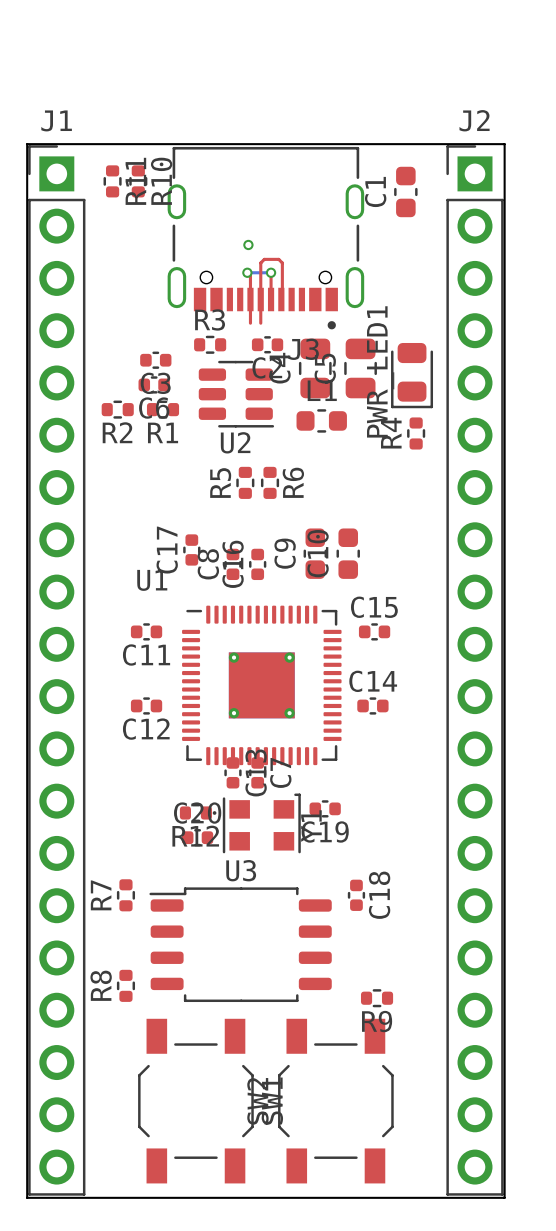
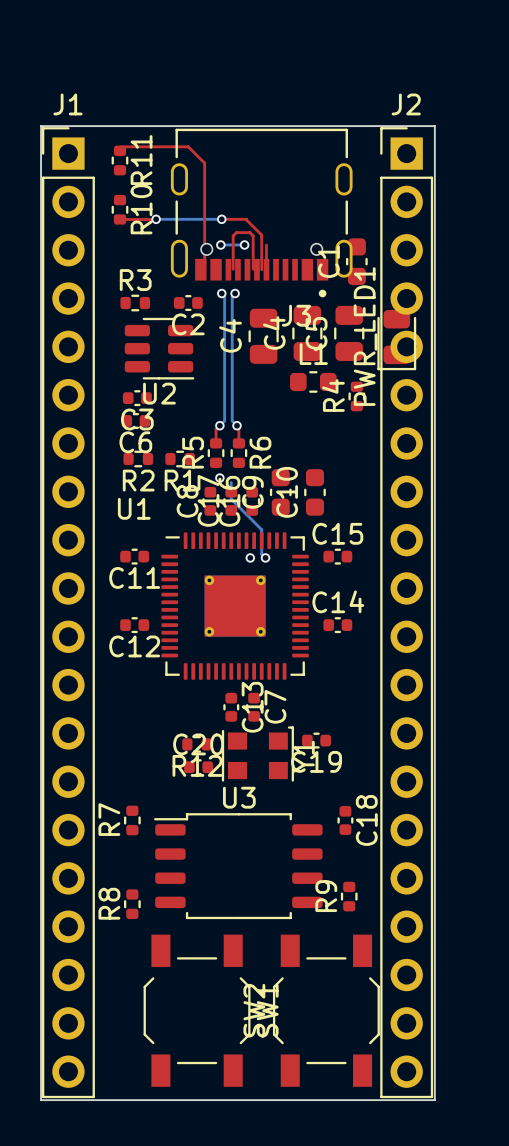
board edge: (453, 144) (504, 144) (504, 1197) (453, 1197) -> (434, 126) (434, 1100)
top track: none -> (120, 146) (188, 146) (204, 163) (204, 269)
R10 position: (138, 181) -> (120, 209)
C1 position: (405, 191) -> (356, 261)
bottom track: none -> (156, 219) (221, 219)
via: none -> (156, 219)
top track: none -> (221, 219) (246, 219) (261, 235) (261, 269)
via: none -> (221, 219)
via: (248, 244) -> none
top track: none -> (120, 219) (155, 219)
via: none -> (220, 244)
top track: (247, 272) (250, 275) (250, 323) -> none
bottom track: (247, 272) (271, 272) -> (220, 244) (242, 244)
via: (271, 272) -> none
top track: (260, 299) (260, 262) (264, 259) (278, 259) (282, 262) (282, 299) -> (233, 269) (233, 235) (236, 232) (249, 232) (253, 235) (253, 269)
top track: (260, 299) (260, 323) -> none
bottom track: none -> (221, 293) (224, 296) (224, 420) (219, 425)
via: none -> (221, 293)
bottom track: none -> (235, 293) (232, 296) (232, 420) (237, 425)
via: none -> (235, 293)
R3 position: (210, 344) -> (135, 303)
C2 position: (267, 344) -> (188, 303)
C3 position: (155, 360) -> (137, 398)
C4: none -> (263, 336)
C6 position: (154, 384) -> (135, 420)
U2 position: (236, 394) -> (159, 348)
R2 position: (117, 409) -> (138, 459)
R1 position: (163, 409) -> (180, 459)
R4 position: (416, 433) -> (356, 396)
top track: none -> (219, 425) (216, 429) (216, 443)
via: none -> (219, 425)
top track: none -> (237, 425) (238, 427) (238, 443)
via: none -> (237, 425)
R5 position: (245, 482) -> (216, 453)
R6 position: (270, 482) -> (238, 453)
via: none -> (219, 478)
bottom track: none -> (231, 482) (231, 499) (261, 529) (261, 554) (265, 557)
C17 position: (191, 549) -> (231, 501)
C9 position: (315, 553) -> (280, 492)
C10 position: (348, 553) -> (314, 492)
C8 position: (232, 564) -> (210, 501)
C16 position: (257, 564) -> (252, 501)
via: none -> (250, 557)
via: none -> (265, 557)
C11 position: (146, 631) -> (134, 556)
C15 position: (374, 631) -> (337, 556)
J2 position: (475, 670) -> (406, 612)
U1 position: (261, 685) -> (235, 606)
C12 position: (146, 705) -> (134, 625)
C14 position: (372, 705) -> (337, 625)
R9 rotation: 0° (377, 998) -> 90° clockwise (349, 896)
R9 position: (377, 998) -> (349, 896)

